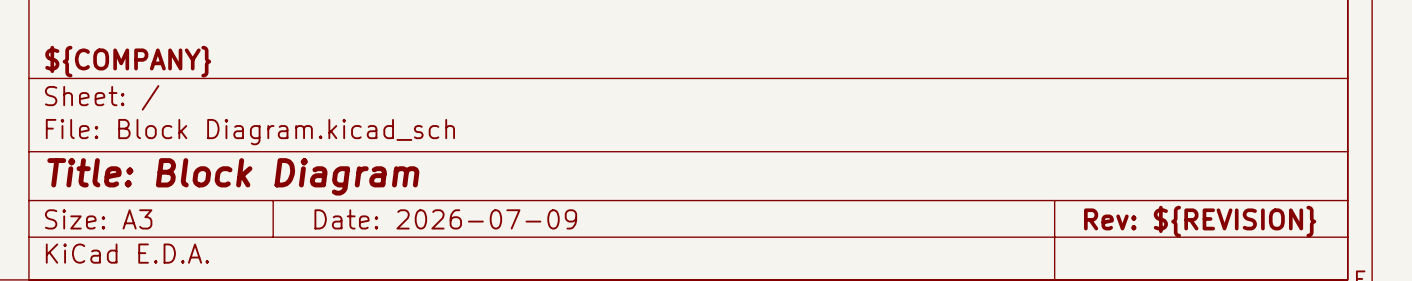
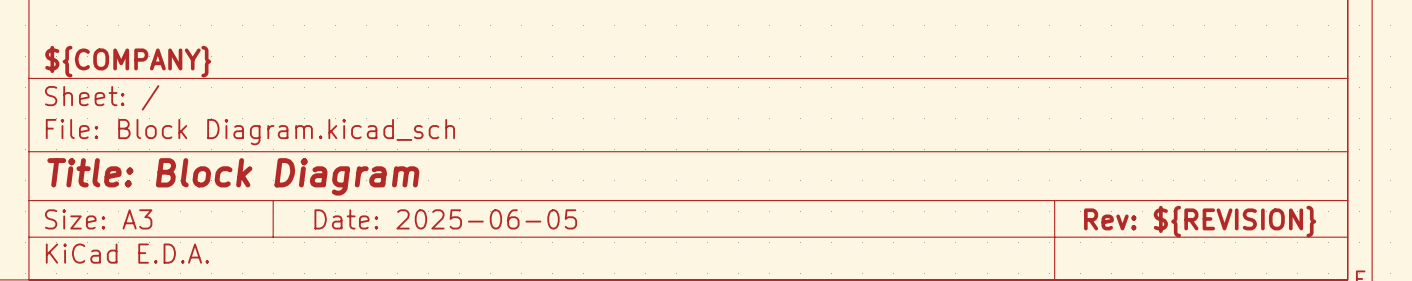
title block: Date: 2026-07-09 (445, 219) -> Date: 2025-06-05 (445, 219)

